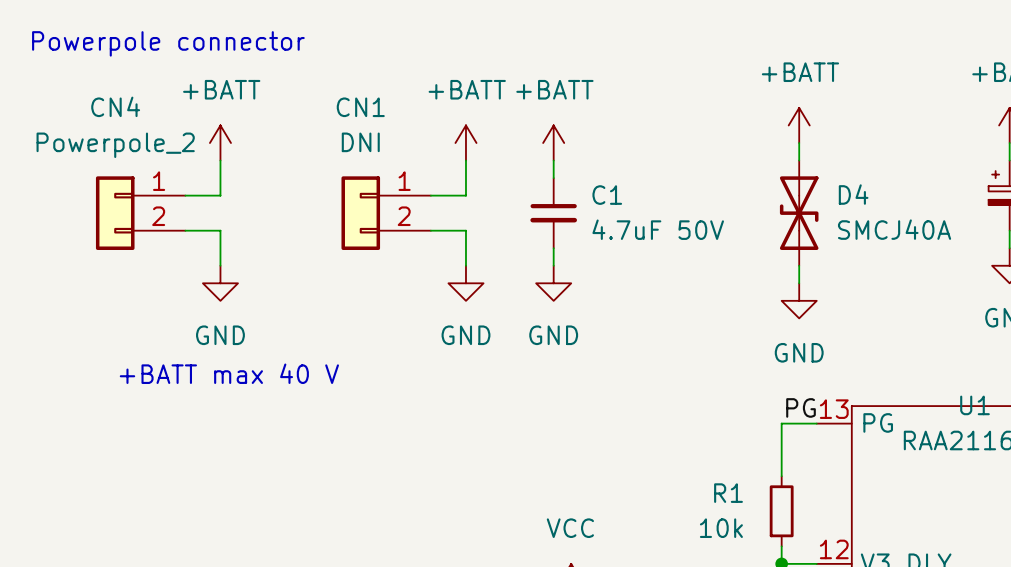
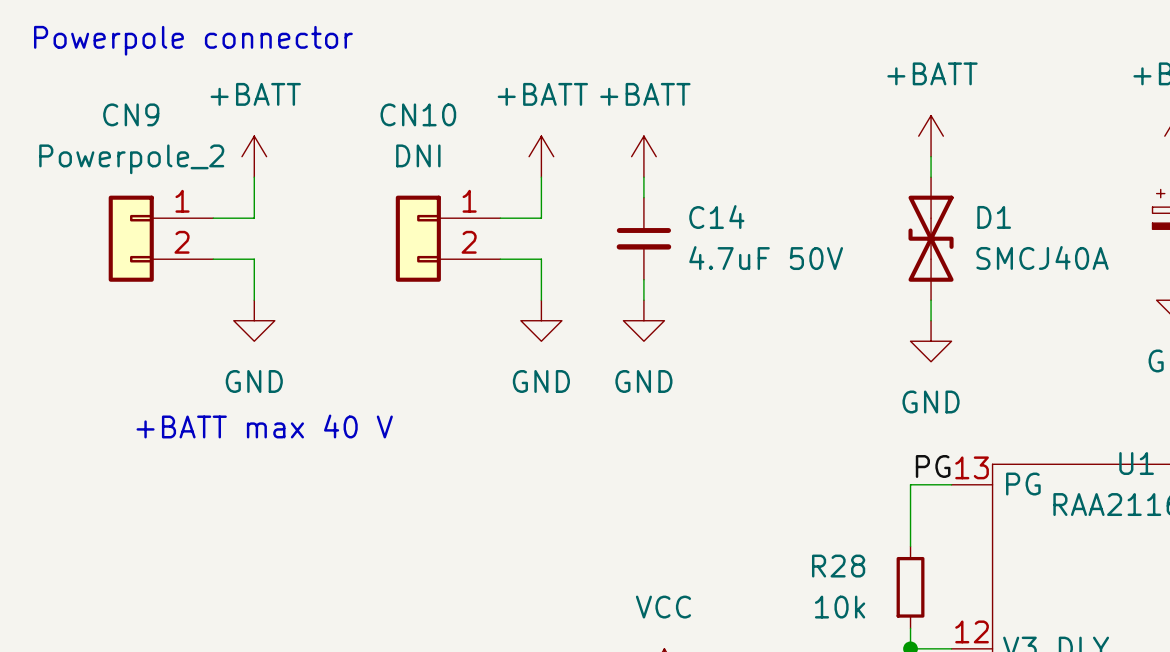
CN4 name: CN4 (115, 106) -> CN9 (131, 114)
CN1 name: CN1 (360, 107) -> CN10 (418, 114)
D4 name: D4 (853, 194) -> D1 (994, 217)
C1 name: C1 (607, 195) -> C14 (716, 217)
R1 name: R1 (728, 493) -> R28 (838, 566)

